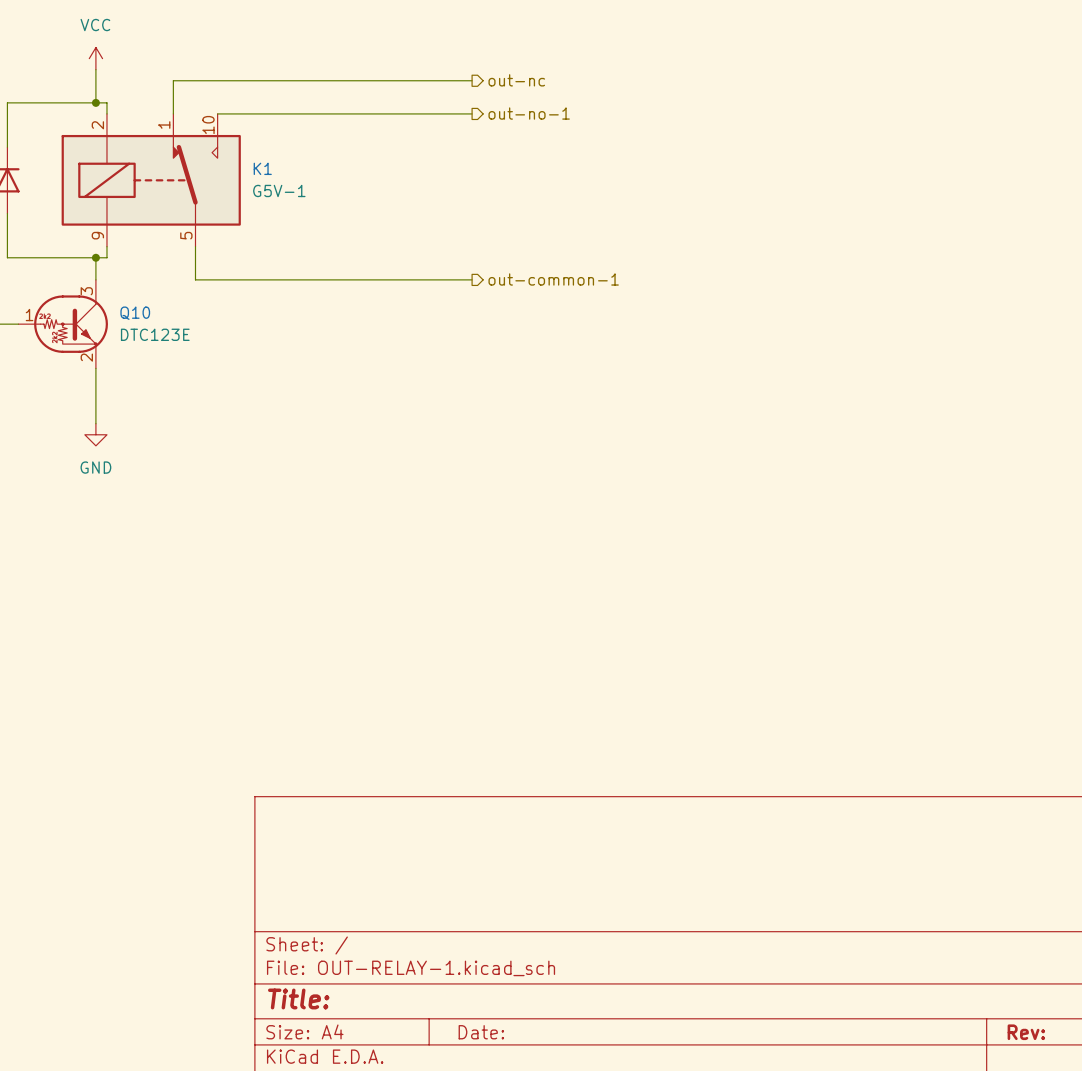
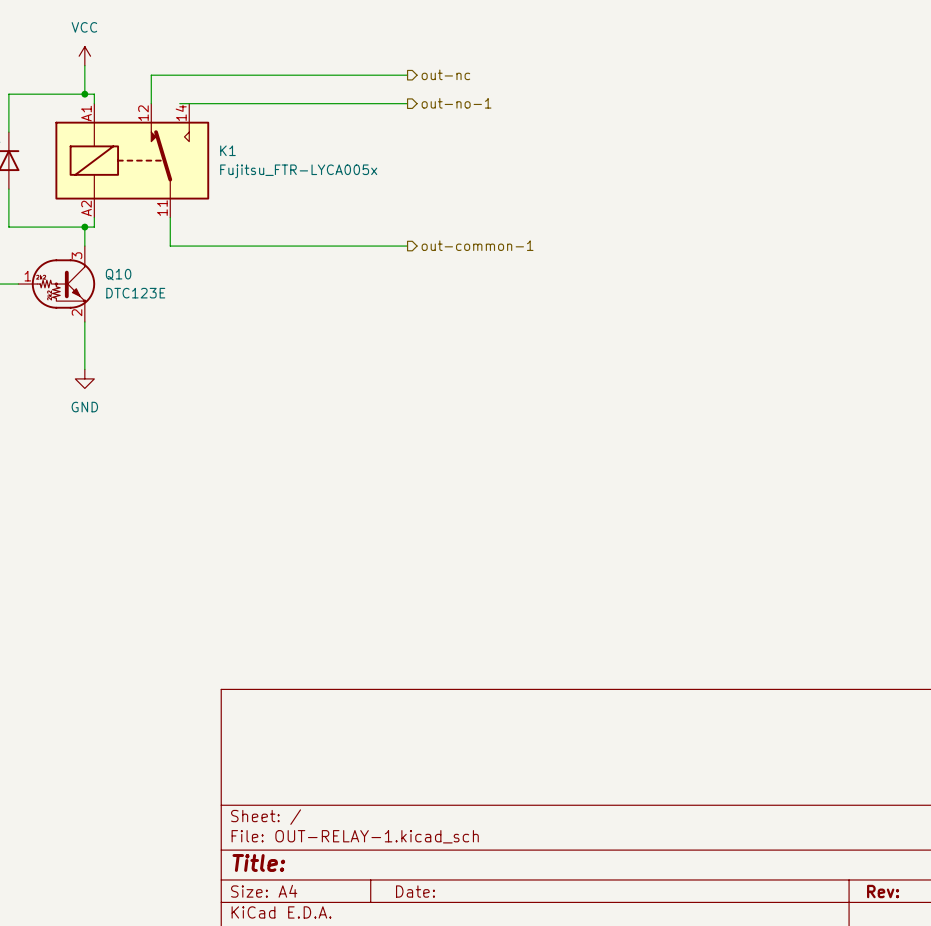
wire: none -> (179, 103) (189, 103)
K1 pin number: 2 (97, 125) -> A1 (86, 113)
K1 pin number: 1 (164, 125) -> 12 (143, 113)
K1 pin number: 10 (208, 125) -> 14 (181, 112)
K1 value: G5V-1 (279, 190) -> Fujitsu_FTR-LYCA005x (298, 171)
K1 pin number: 9 (97, 235) -> A2 (86, 208)
K1 pin number: 5 (186, 235) -> 11 (162, 208)

